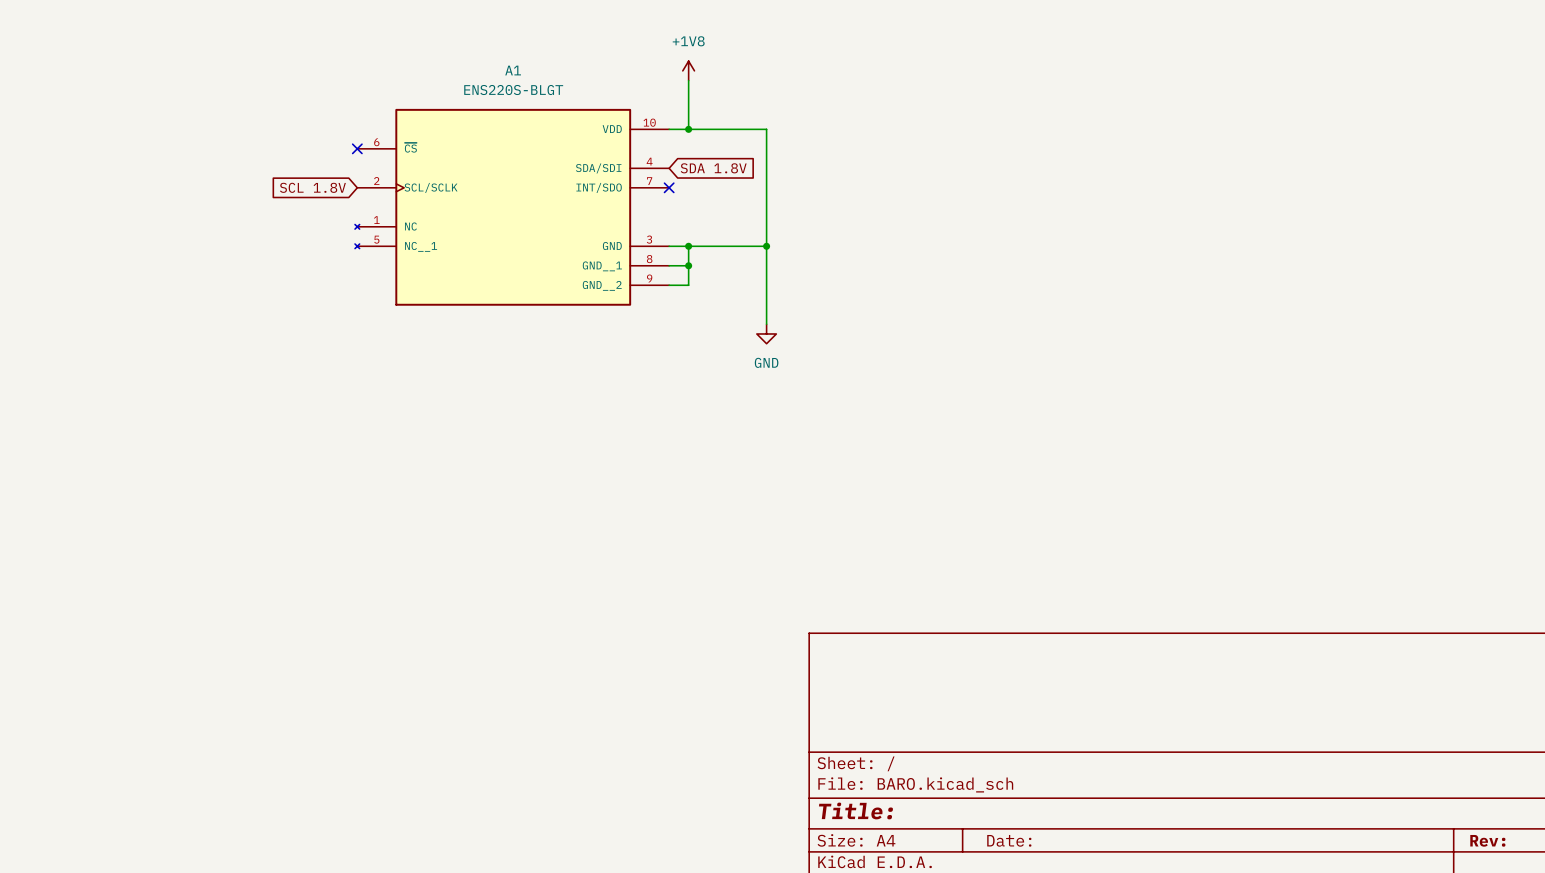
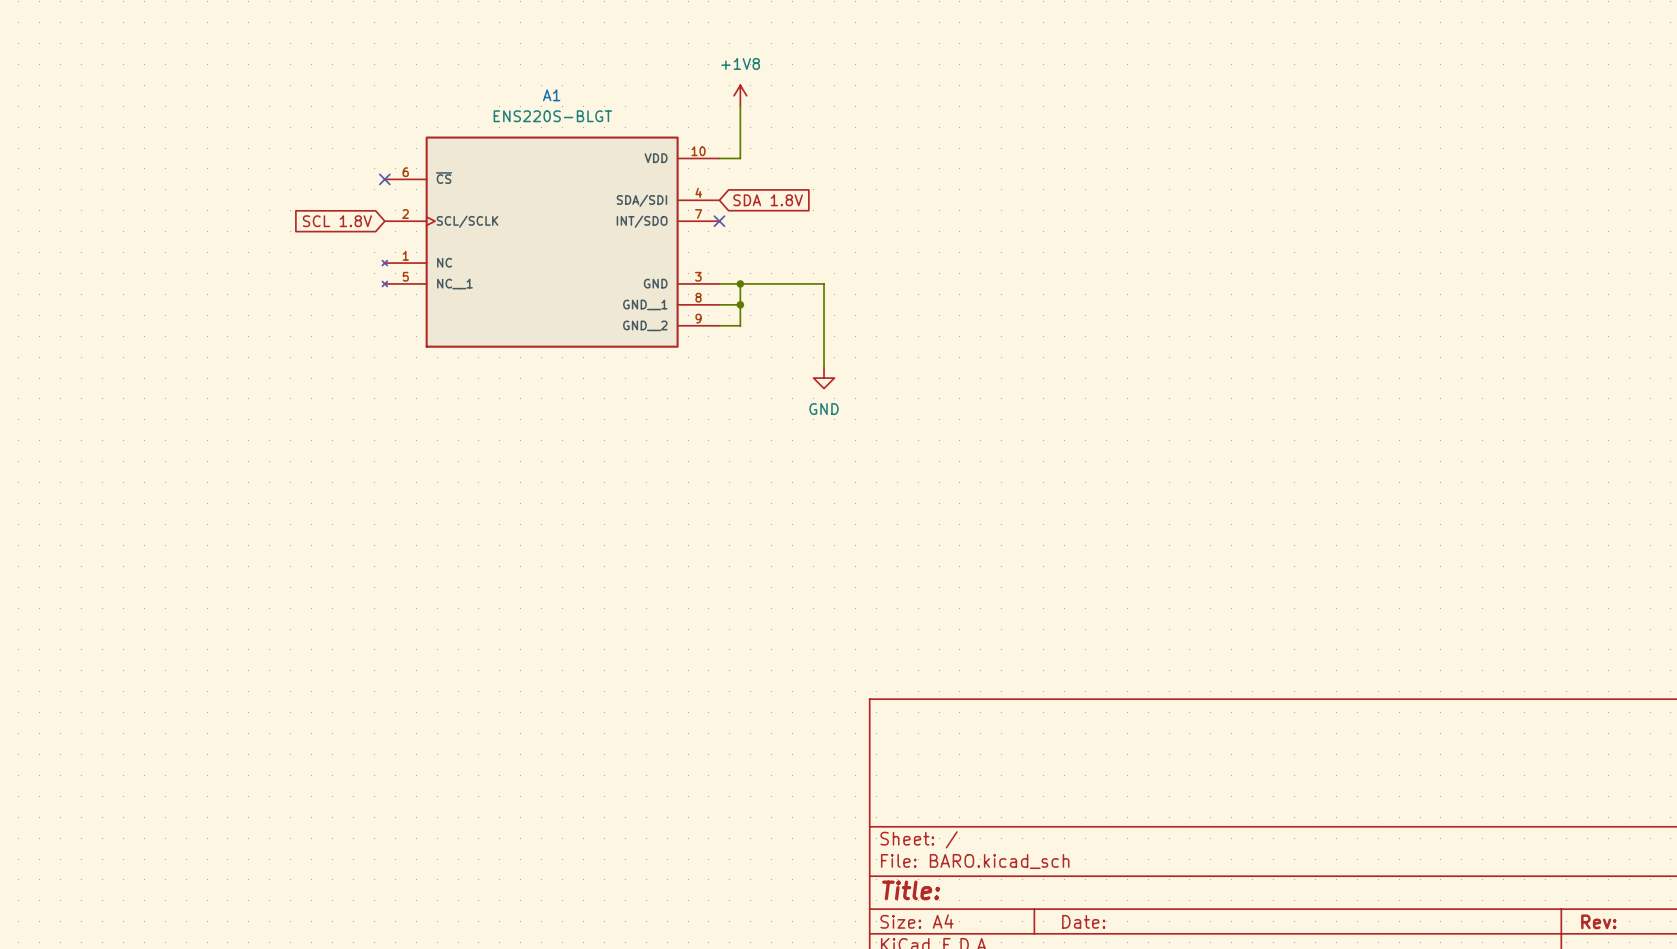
wire: (688, 129) (766, 129) (766, 246) -> none
junction: (688, 129) -> none
junction: (766, 246) -> none

